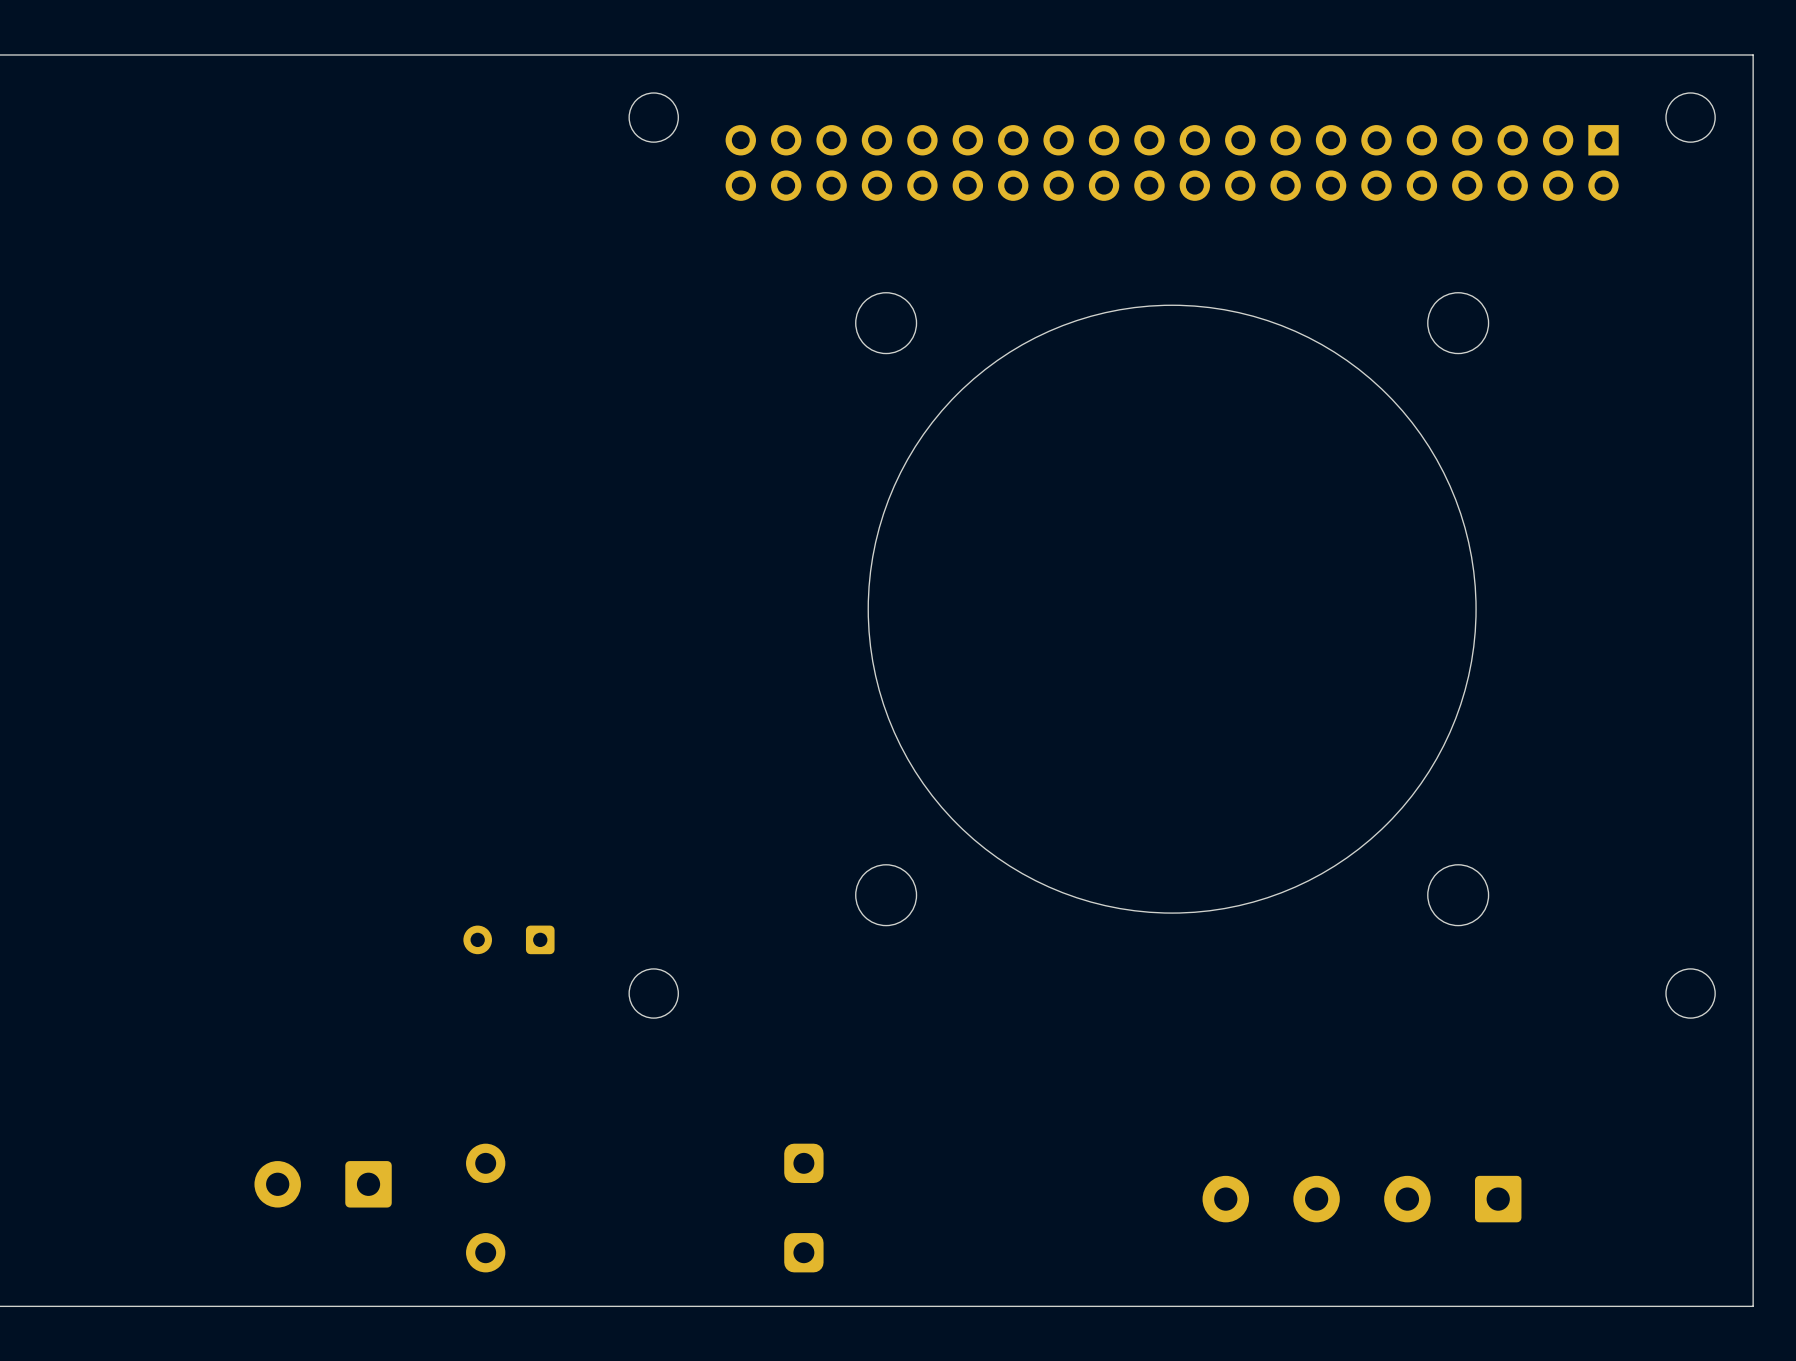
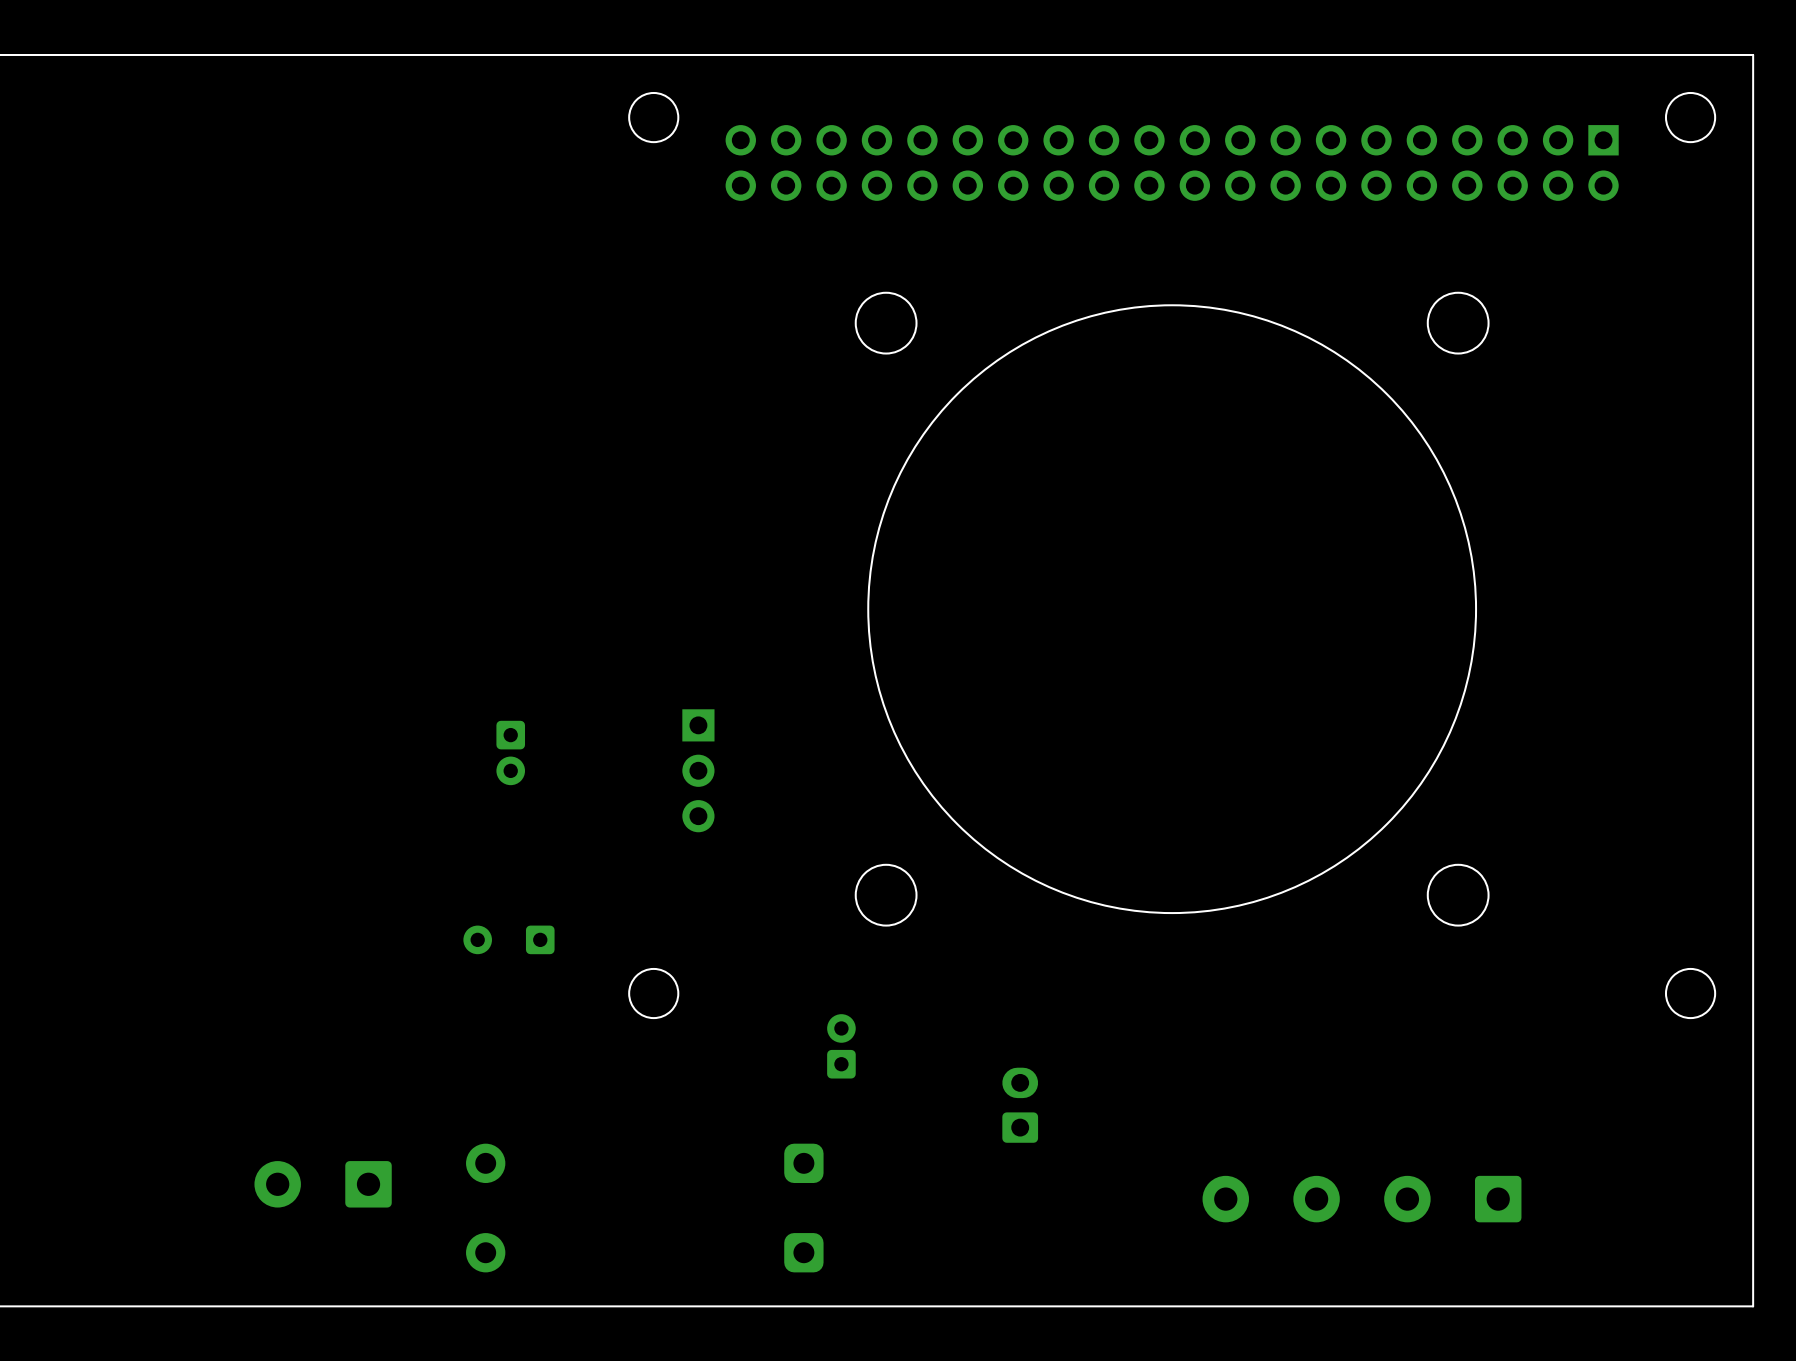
part: none -> (510, 752)
part: none -> (698, 770)
part: none -> (841, 1046)
part: none -> (1020, 1105)

